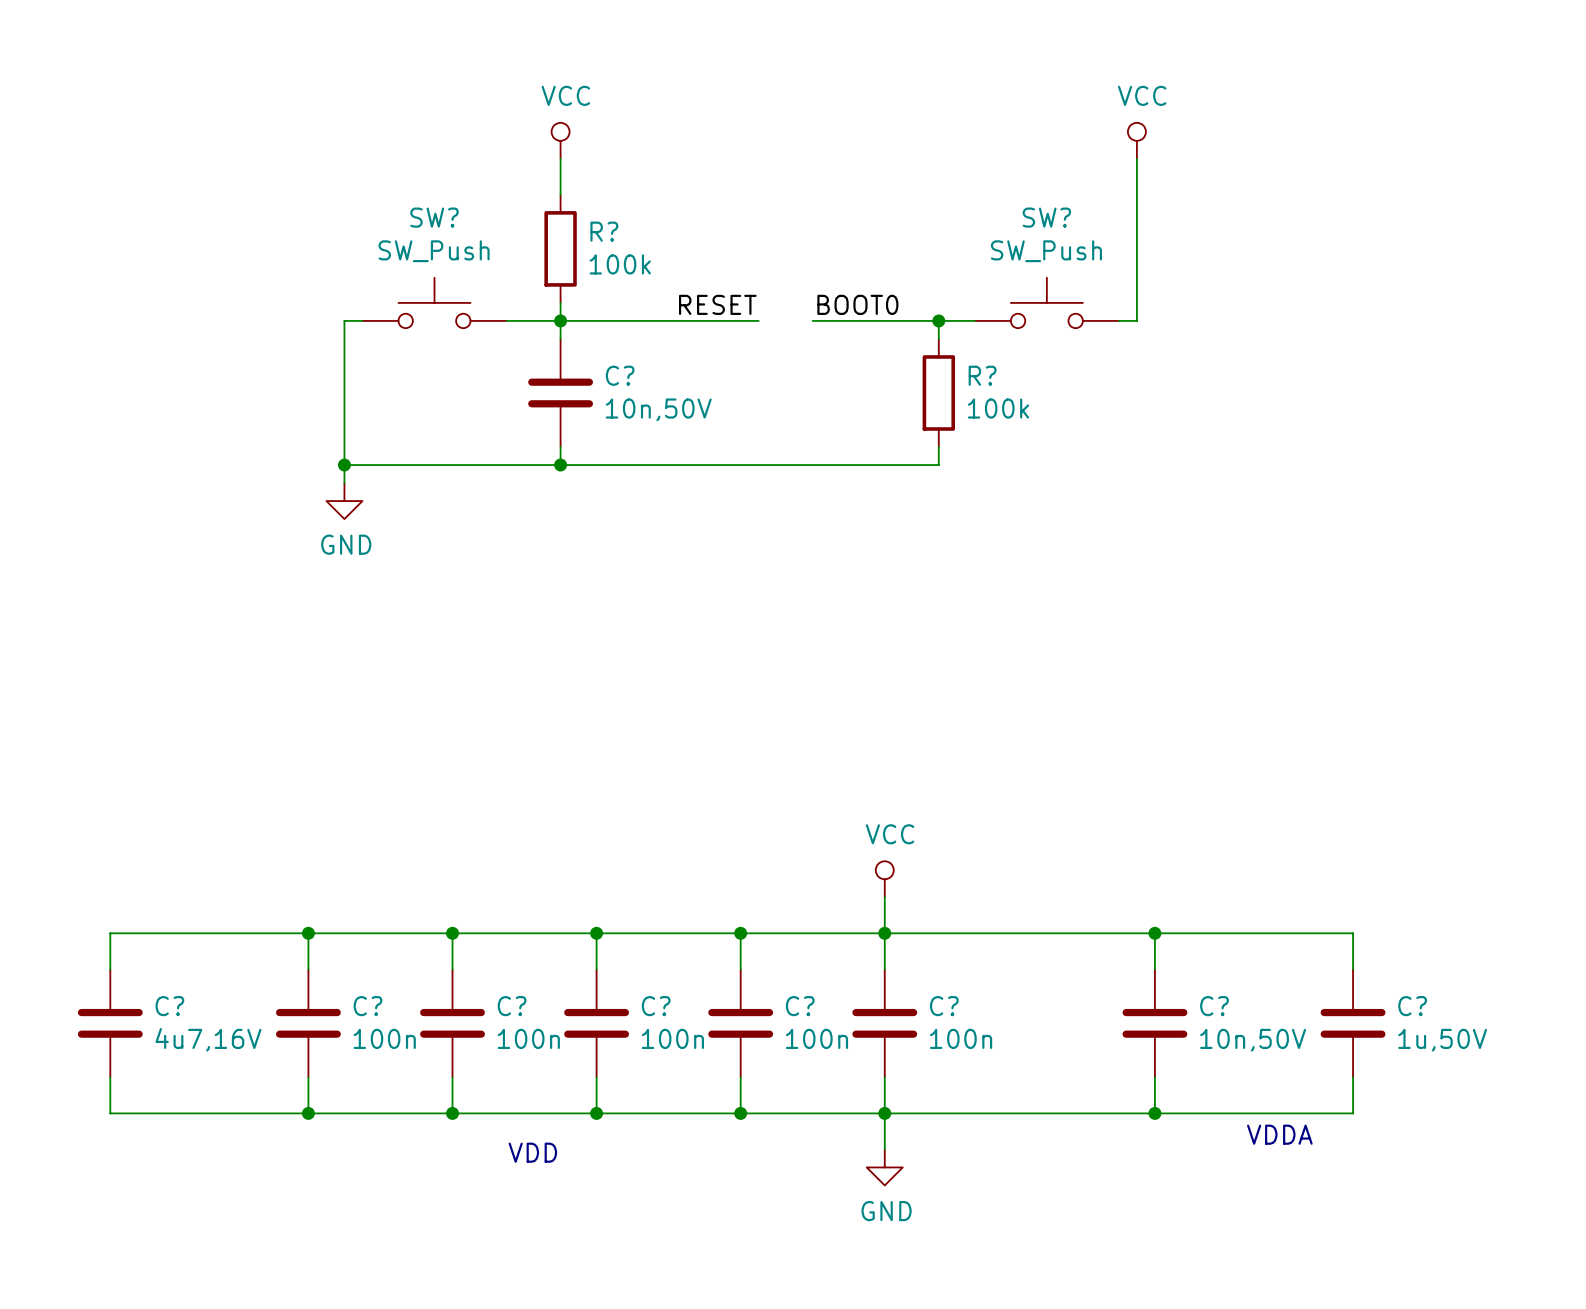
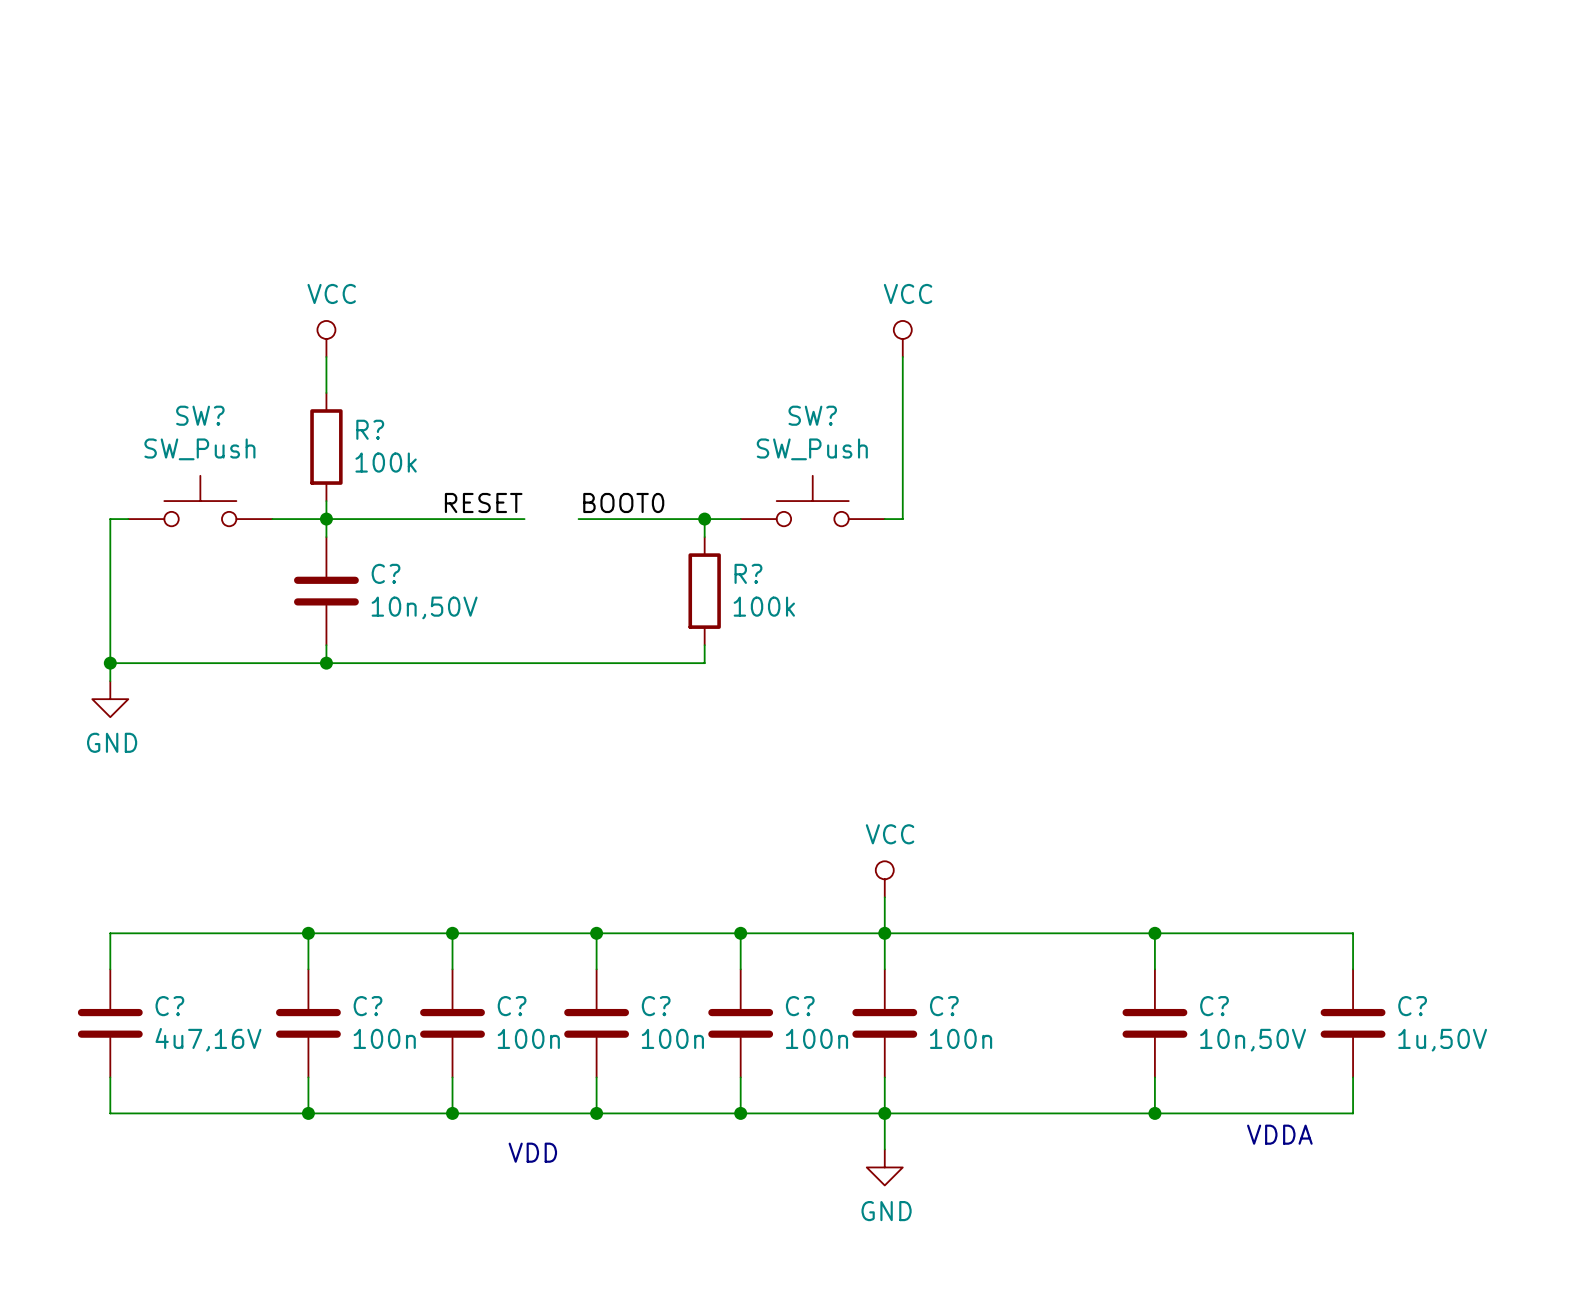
power symbol: VCC (560, 140) -> none
power symbol: VCC (1136, 140) -> none
wire: (560, 158) (560, 194) -> (326, 356) (326, 392)
wire: (1136, 158) (1136, 320) (1118, 320) -> (902, 356) (902, 519) (884, 519)
R?: 100k (560, 248) -> none
SW?: SW_Push (434, 302) -> none
wire: (560, 302) (560, 338) -> (326, 501) (326, 537)
SW?: SW_Push (1046, 302) -> none
label position: RESET (717, 304) -> RESET (483, 502)
label position: BOOT0 (857, 304) -> BOOT0 (623, 502)
wire: (362, 320) (344, 320) (344, 483) -> (128, 519) (110, 519) (110, 681)
wire: (506, 320) (758, 320) -> (272, 519) (524, 519)
junction: (560, 320) -> none
wire: (812, 320) (974, 320) -> (578, 519) (740, 519)
wire: (938, 320) (938, 338) -> (704, 519) (704, 537)
junction: (938, 320) -> none
power symbol: none -> VCC (326, 338)
power symbol: none -> VCC (902, 338)
C? position: (560, 392) -> (326, 591)
R?: 100k (938, 392) -> none
R?: none -> 100k (326, 447)
wire: (560, 447) (560, 465) -> (326, 645) (326, 663)
wire: (938, 447) (938, 465) (344, 465) -> (704, 645) (704, 663) (110, 663)
junction position: (344, 465) -> (326, 519)
junction: (560, 465) -> none
SW?: none -> SW_Push (200, 501)
power symbol position: GND (344, 501) -> GND (110, 699)
SW?: none -> SW_Push (812, 501)
junction: none -> (704, 519)
R?: none -> 100k (704, 591)
junction: none -> (110, 663)
junction: none -> (326, 663)

